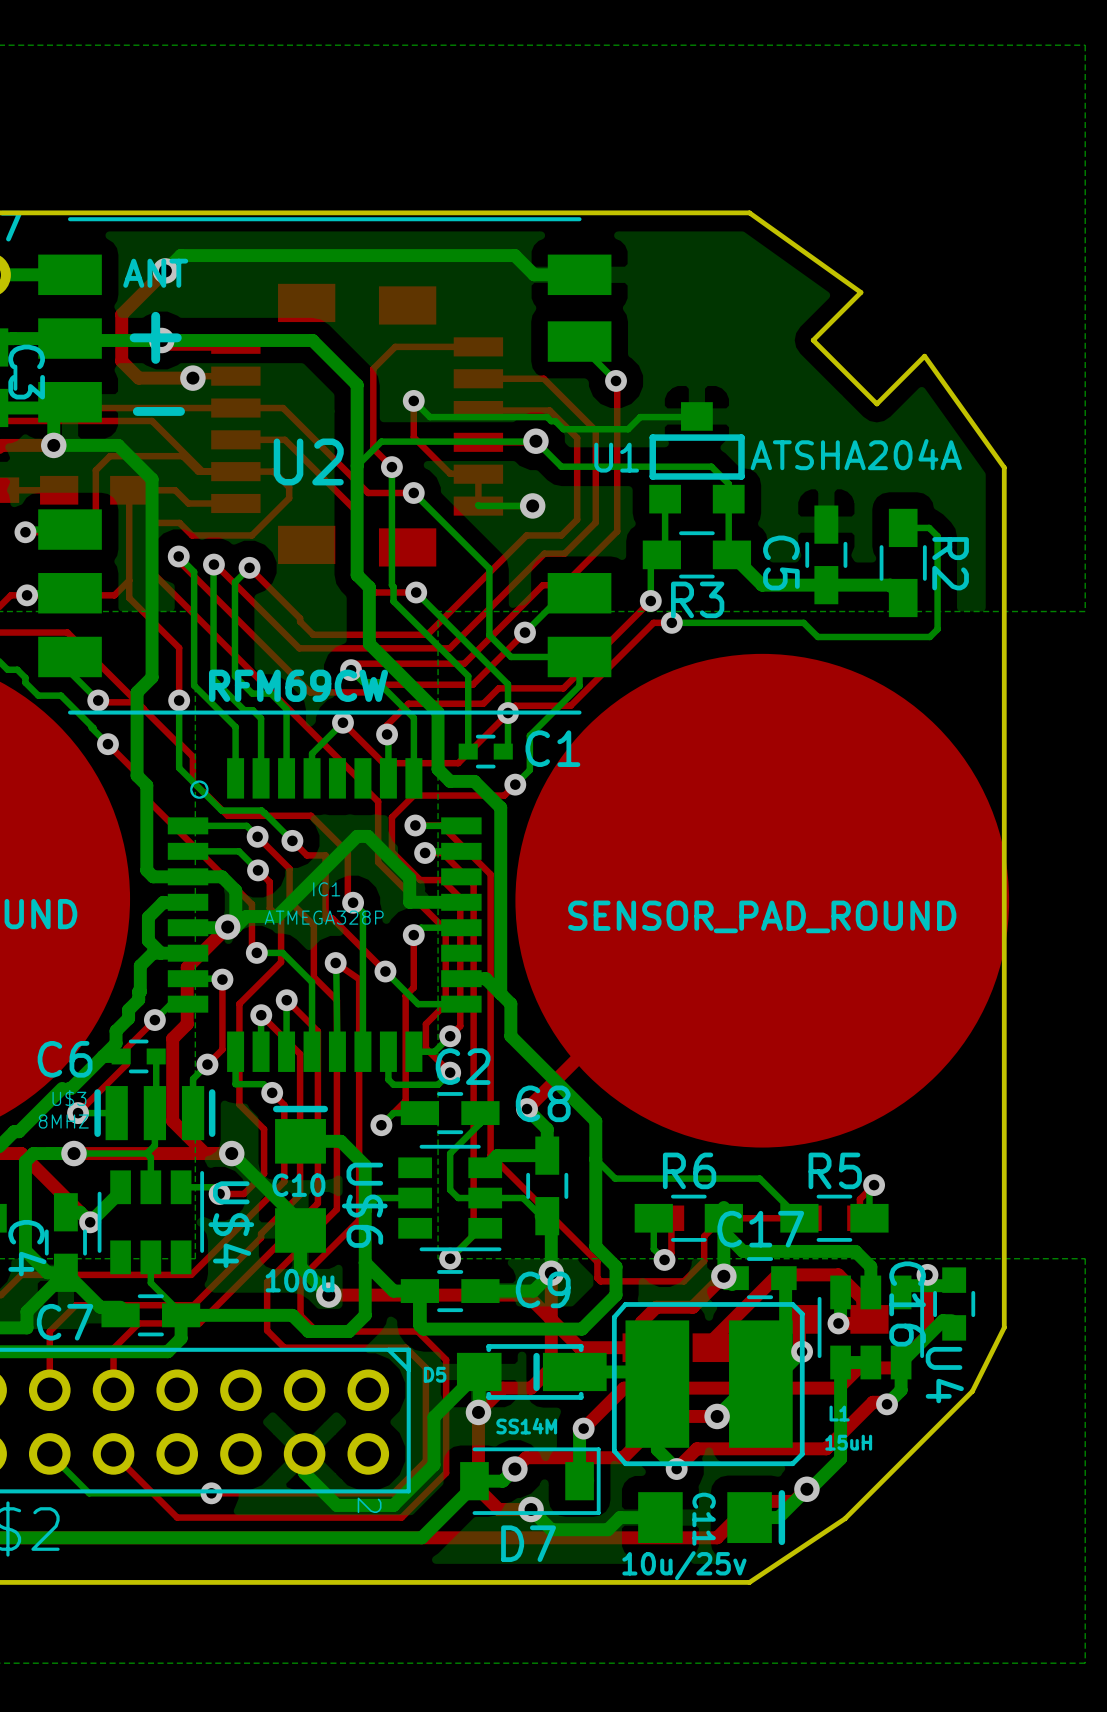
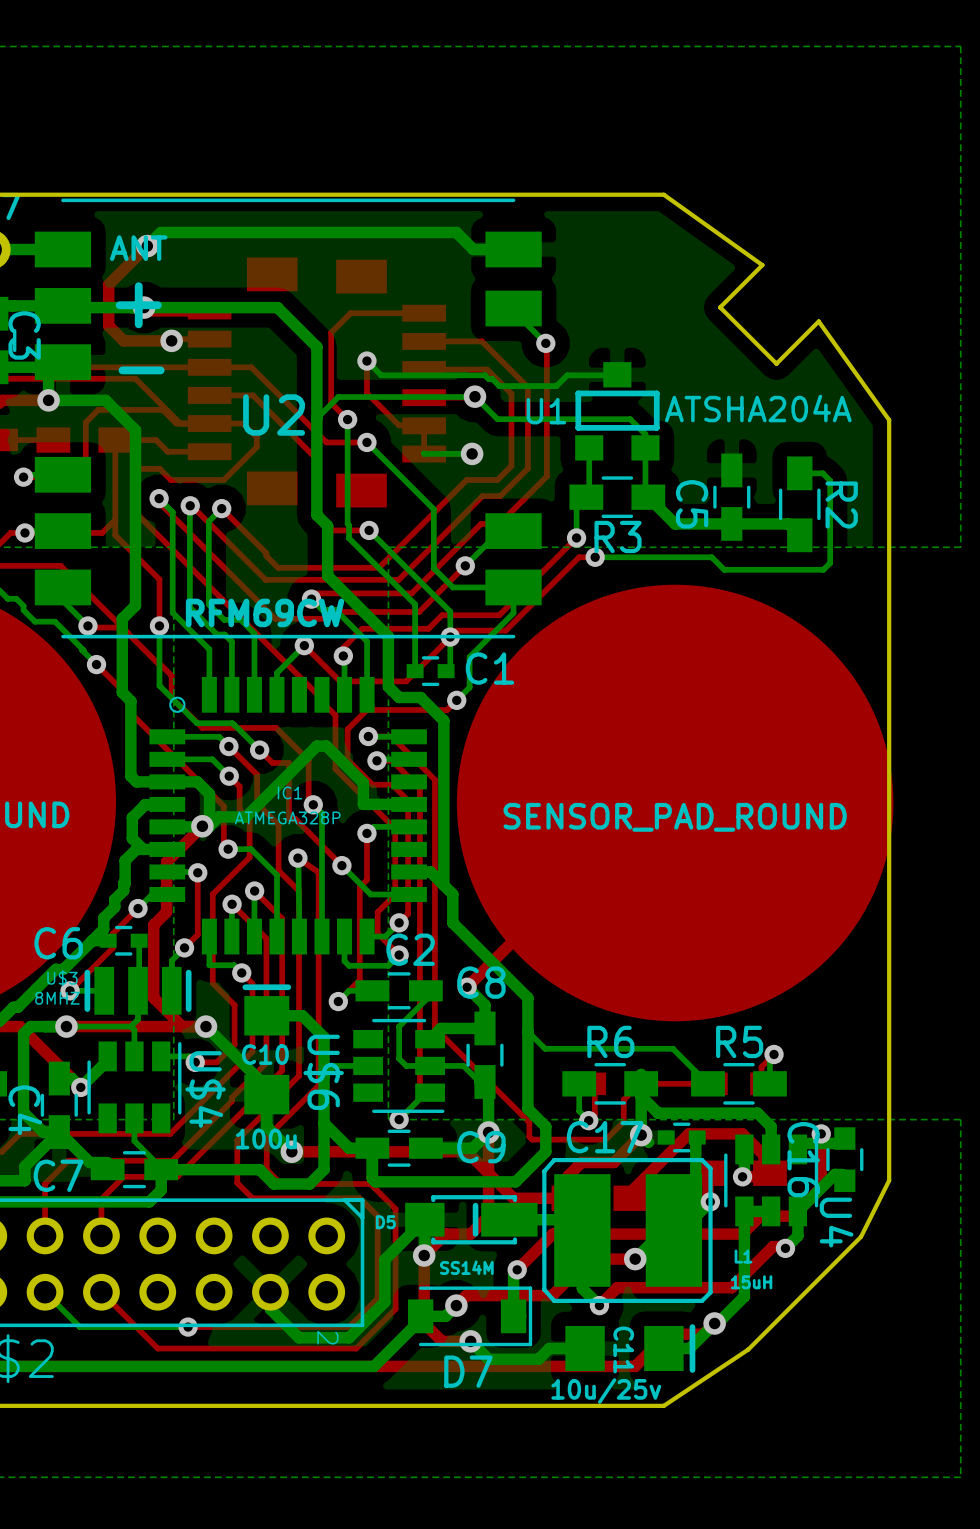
C17 name position: C17 (760, 1229) -> C17 (605, 1137)
C17 footprint: [723, 1257, 797, 1300] -> [657, 1122, 706, 1153]

